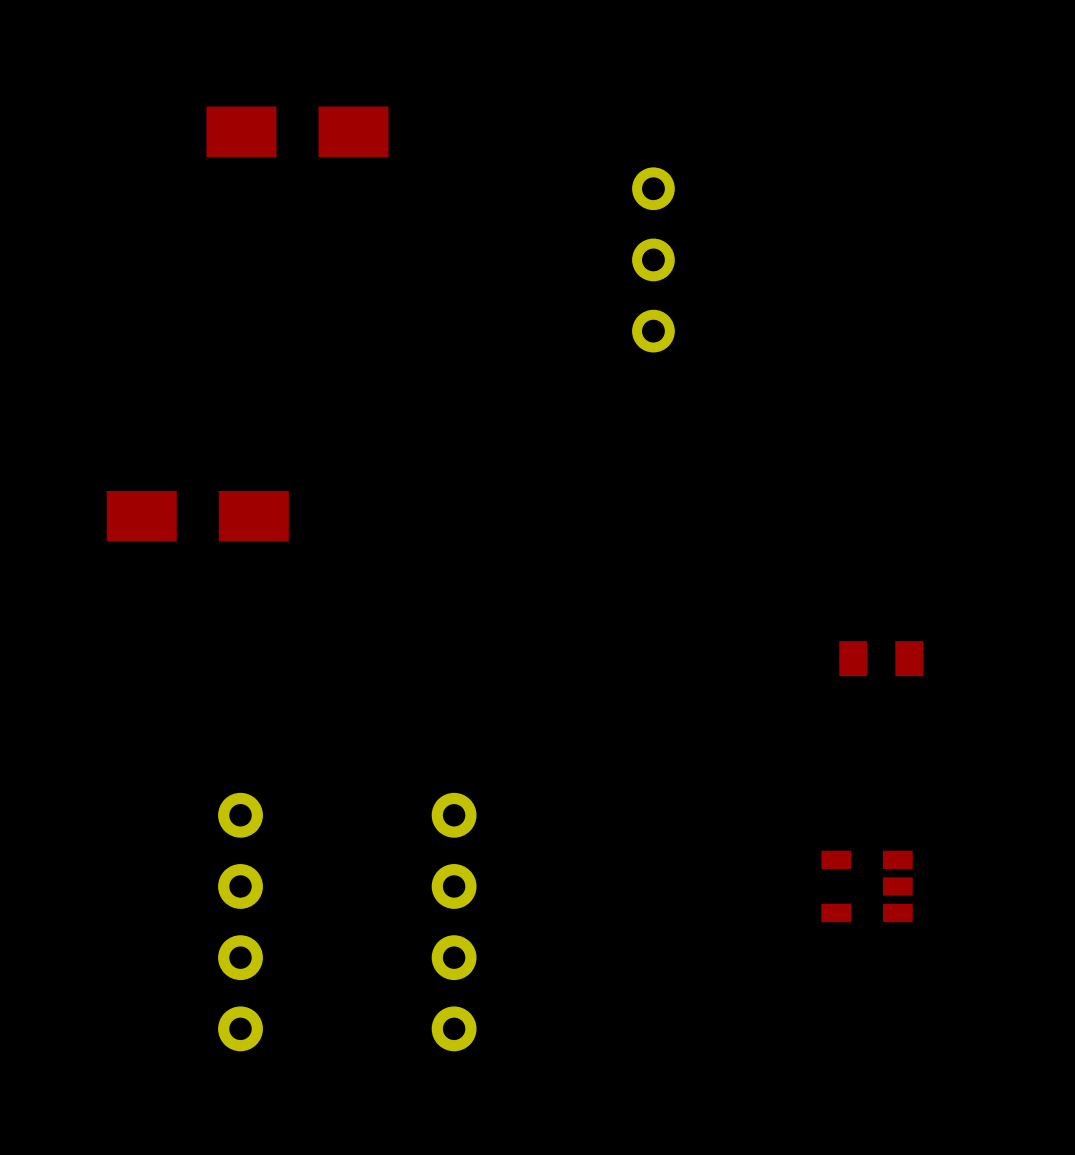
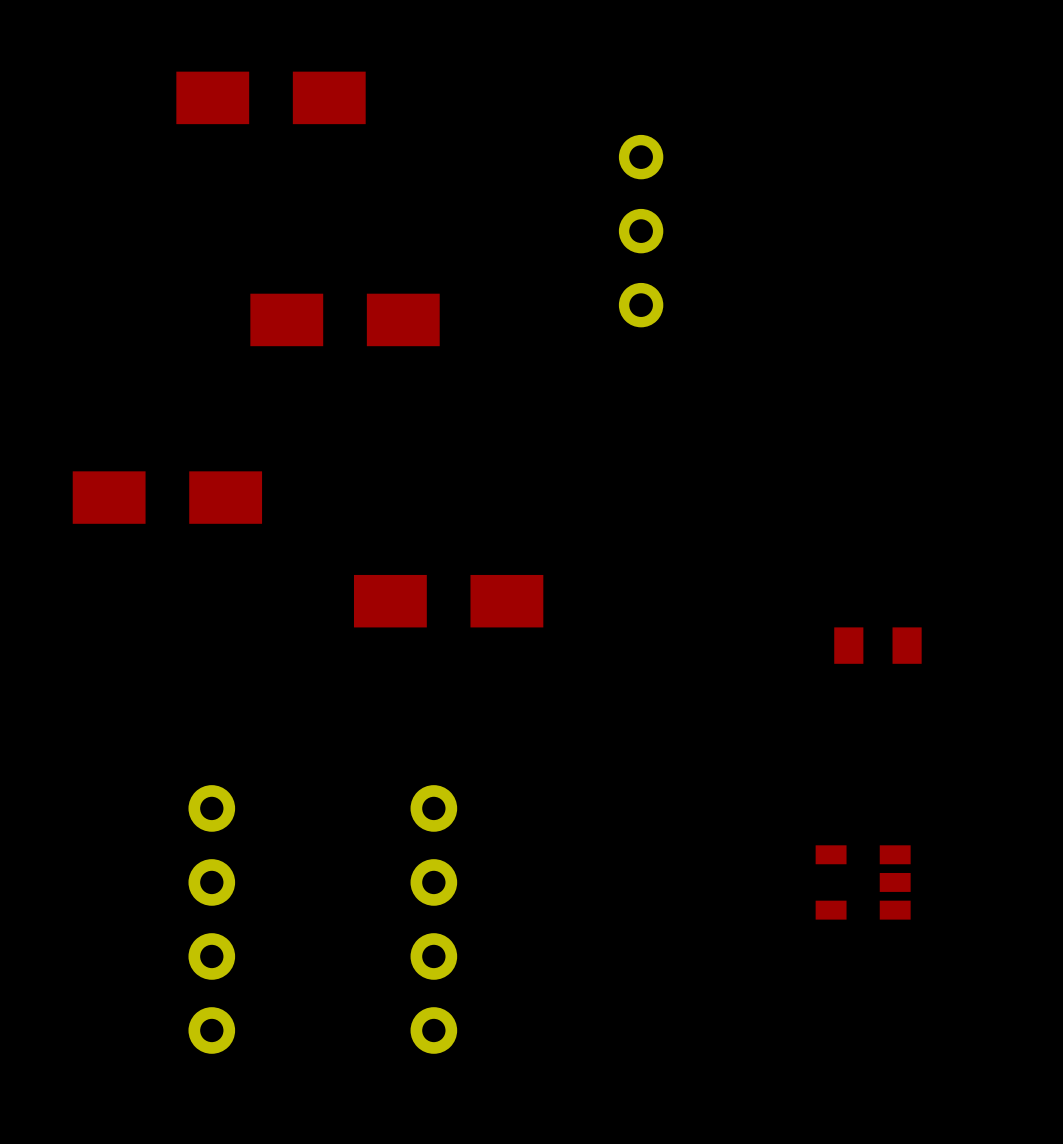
part: none -> (345, 319)
part: none -> (448, 601)

